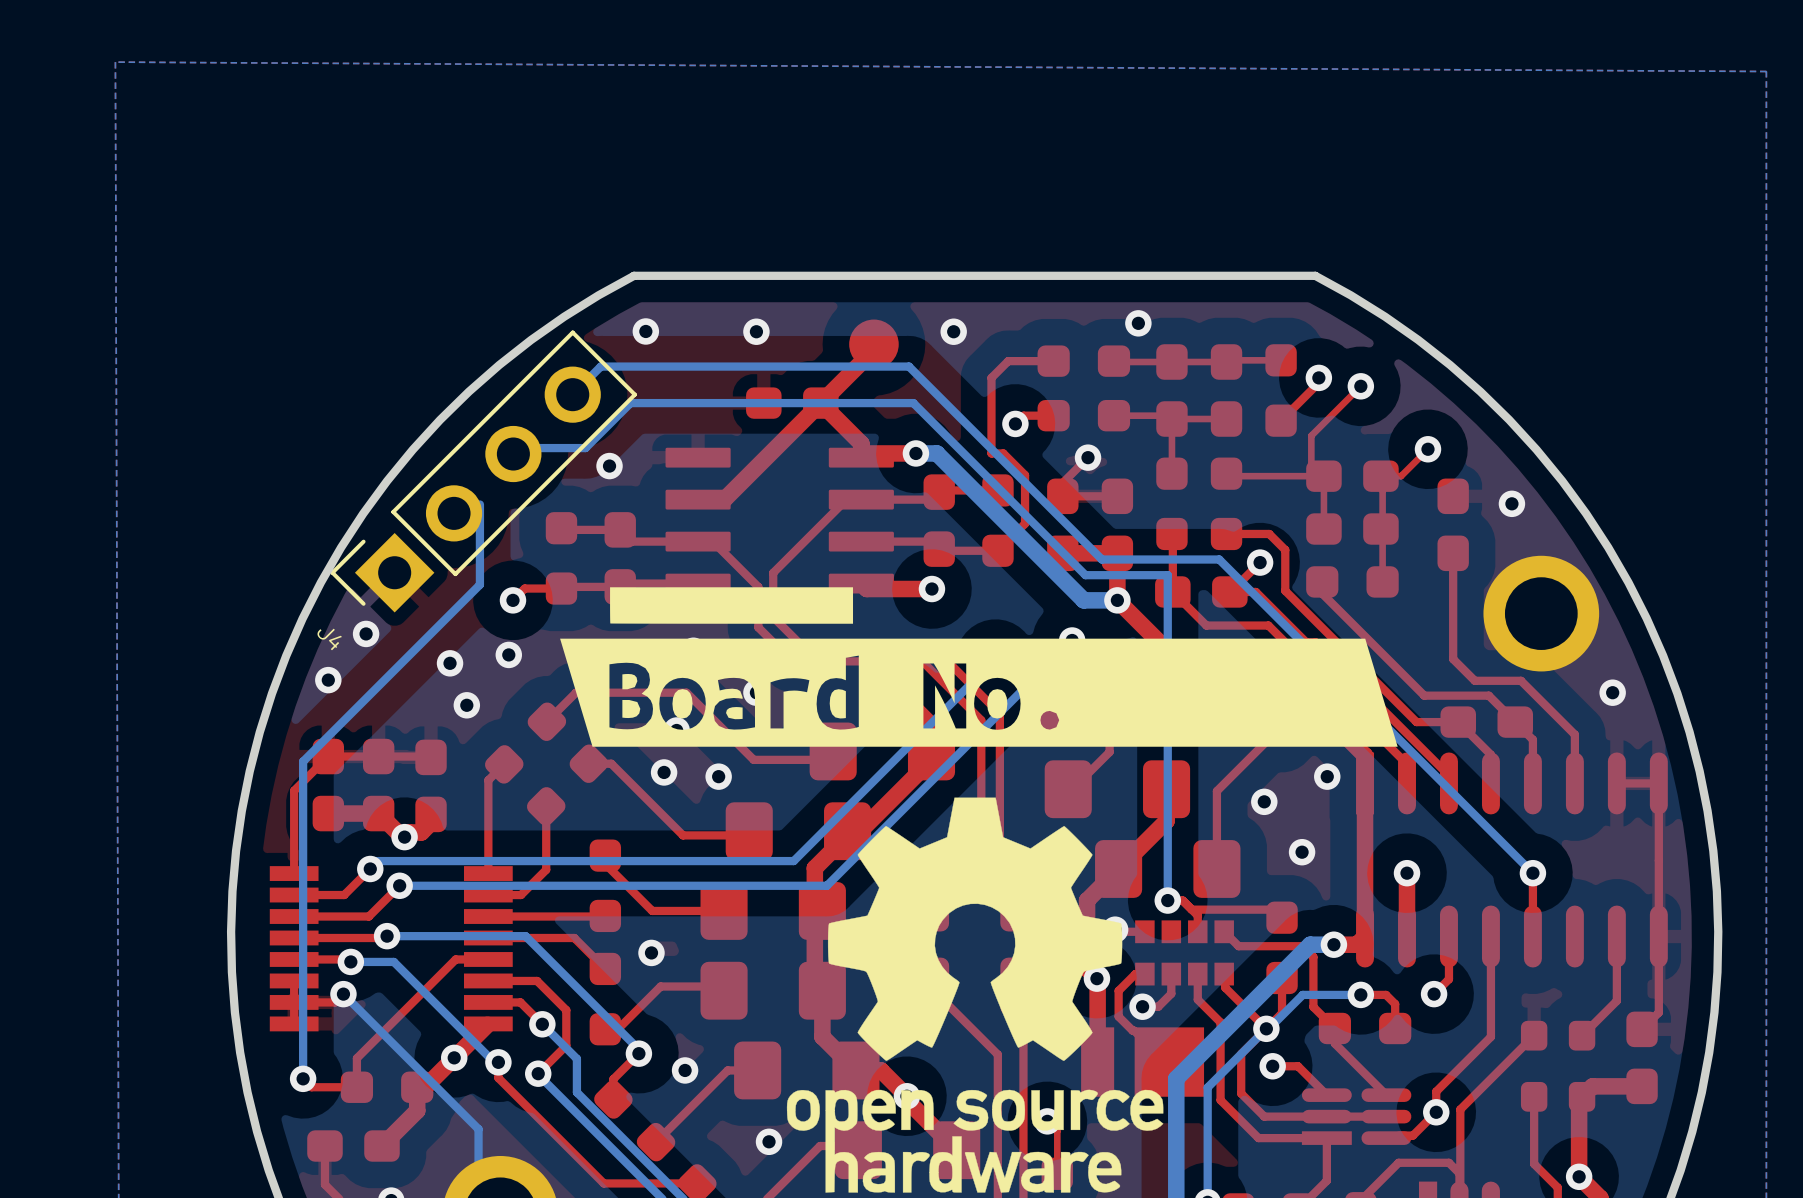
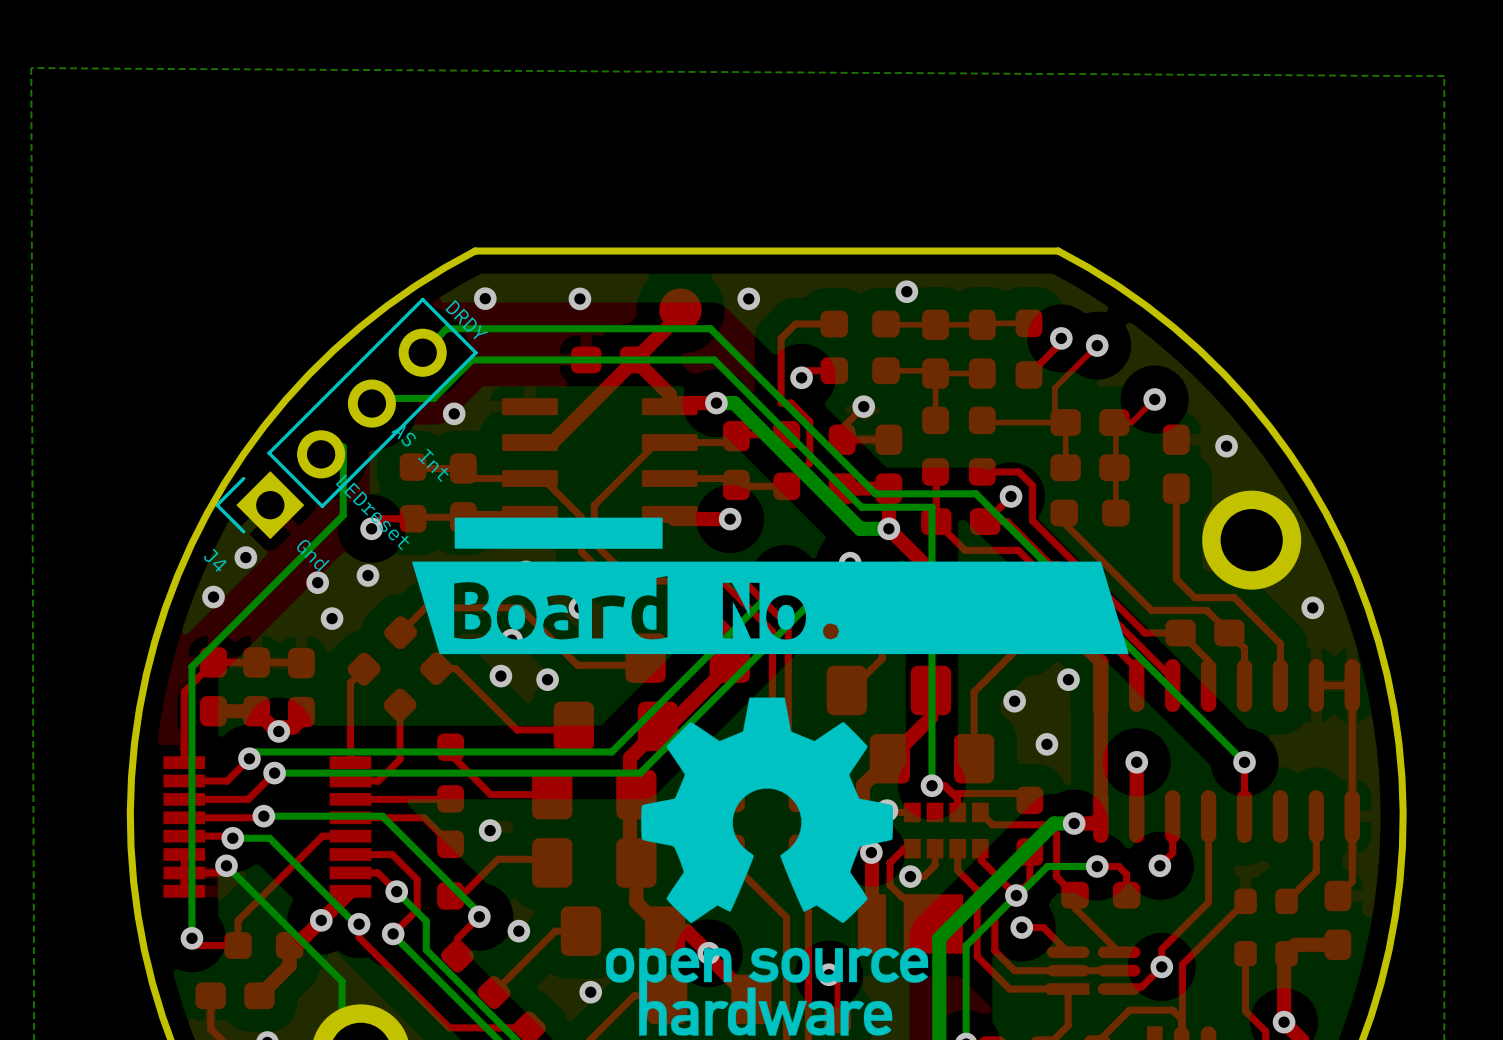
text: none -> DRDY (466, 319)
text: none -> AS Int (419, 453)
text: none -> LEDreset (372, 512)
text: none -> Gnd (313, 555)

